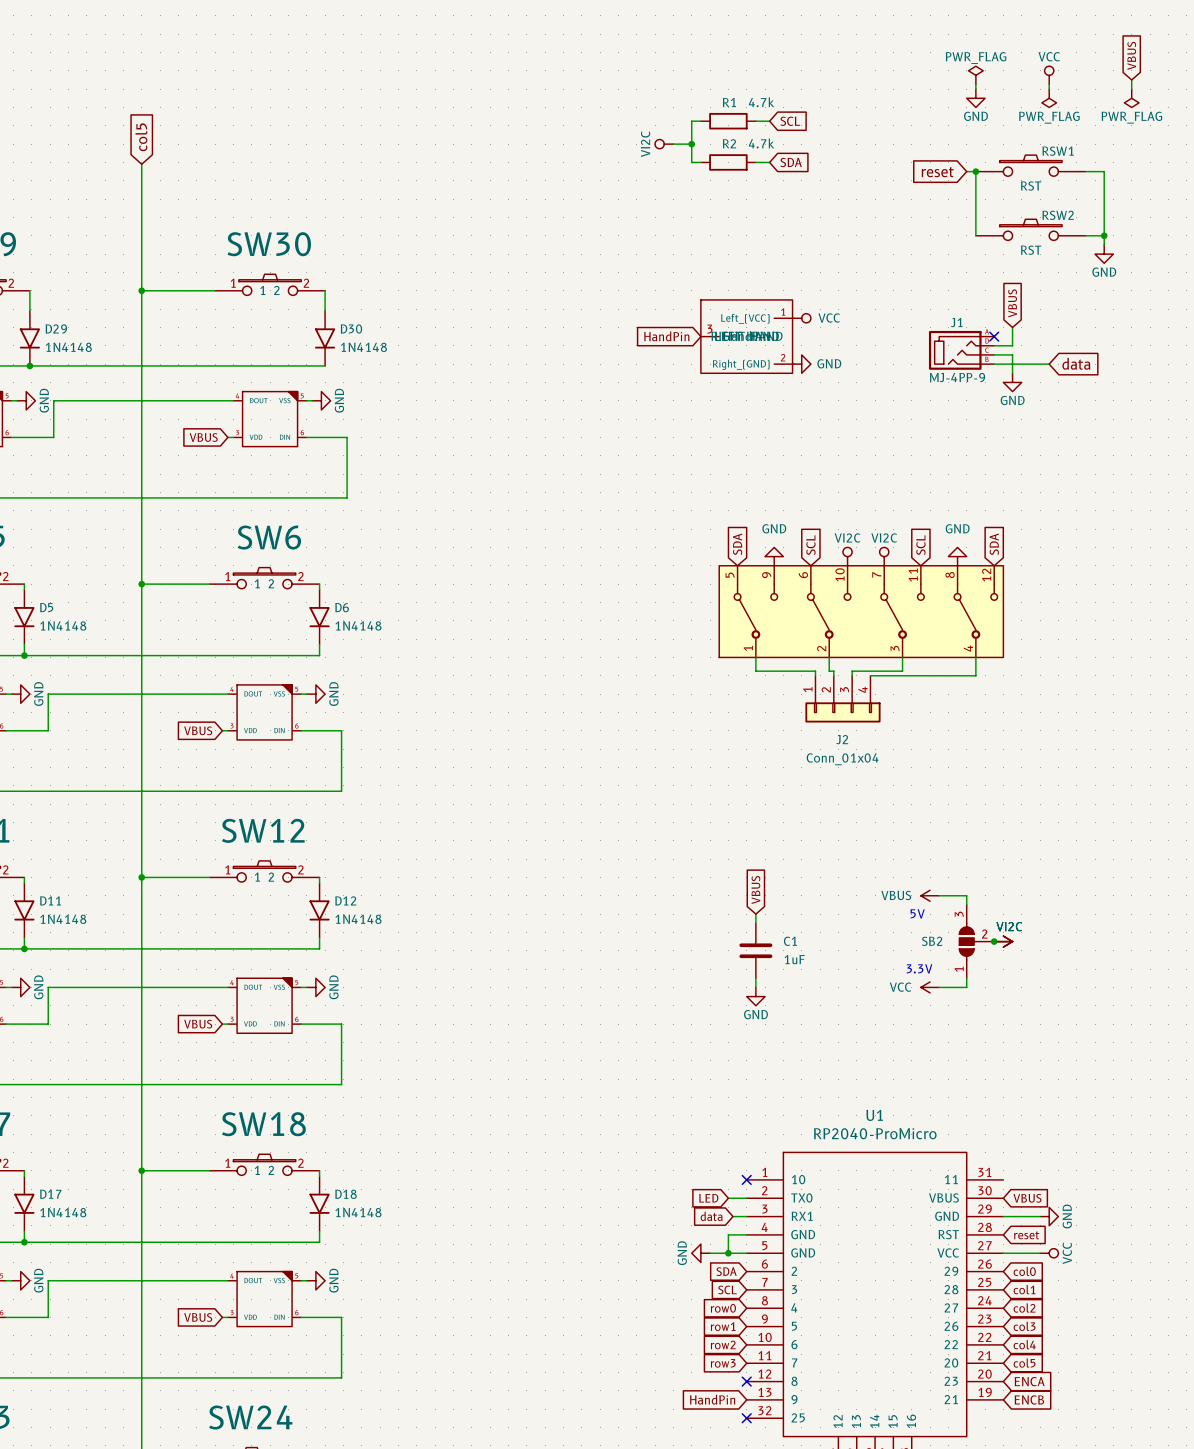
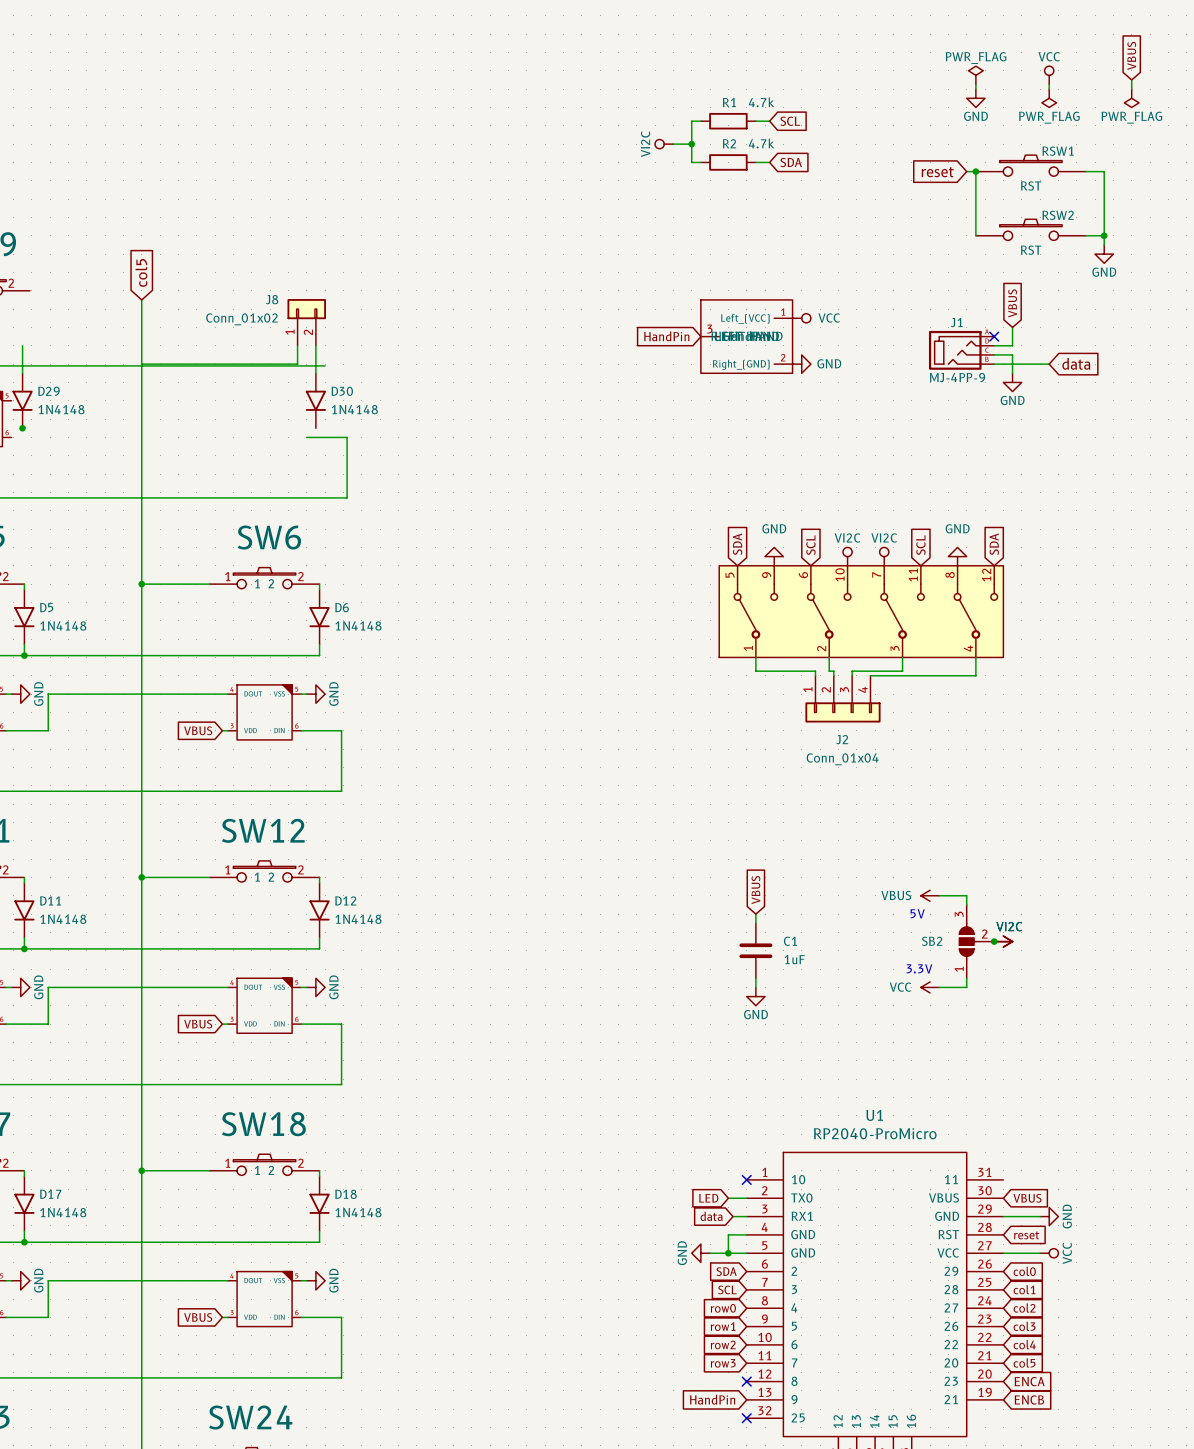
global label position: col5 (141, 137) -> col5 (141, 272)
wire: (141, 164) (141, 299) -> none
wire: (29, 290) (29, 310) -> none
wire: (141, 290) (215, 290) -> none
junction: (141, 290) -> none
J8: none -> Conn_01x02 (306, 322)
D29 position: (29, 338) -> (22, 400)
D30 position: (325, 338) -> (315, 400)
wire: none -> (22, 345) (22, 373)
wire: none -> (297, 345) (297, 364) (141, 364)
wire: none -> (315, 345) (315, 373)
SW30: (270, 360) -> none
junction: (29, 365) -> none
wire: (11, 400) (17, 400) -> none
power symbol: GND (26, 400) -> none
wire: (233, 400) (53, 400) (53, 437) (11, 437) -> none
wire: (306, 400) (312, 400) -> none
power symbol: GND (321, 400) -> none
junction: none -> (22, 428)
global label: VBUS (203, 437) -> none
wire: (227, 437) (233, 437) -> none

